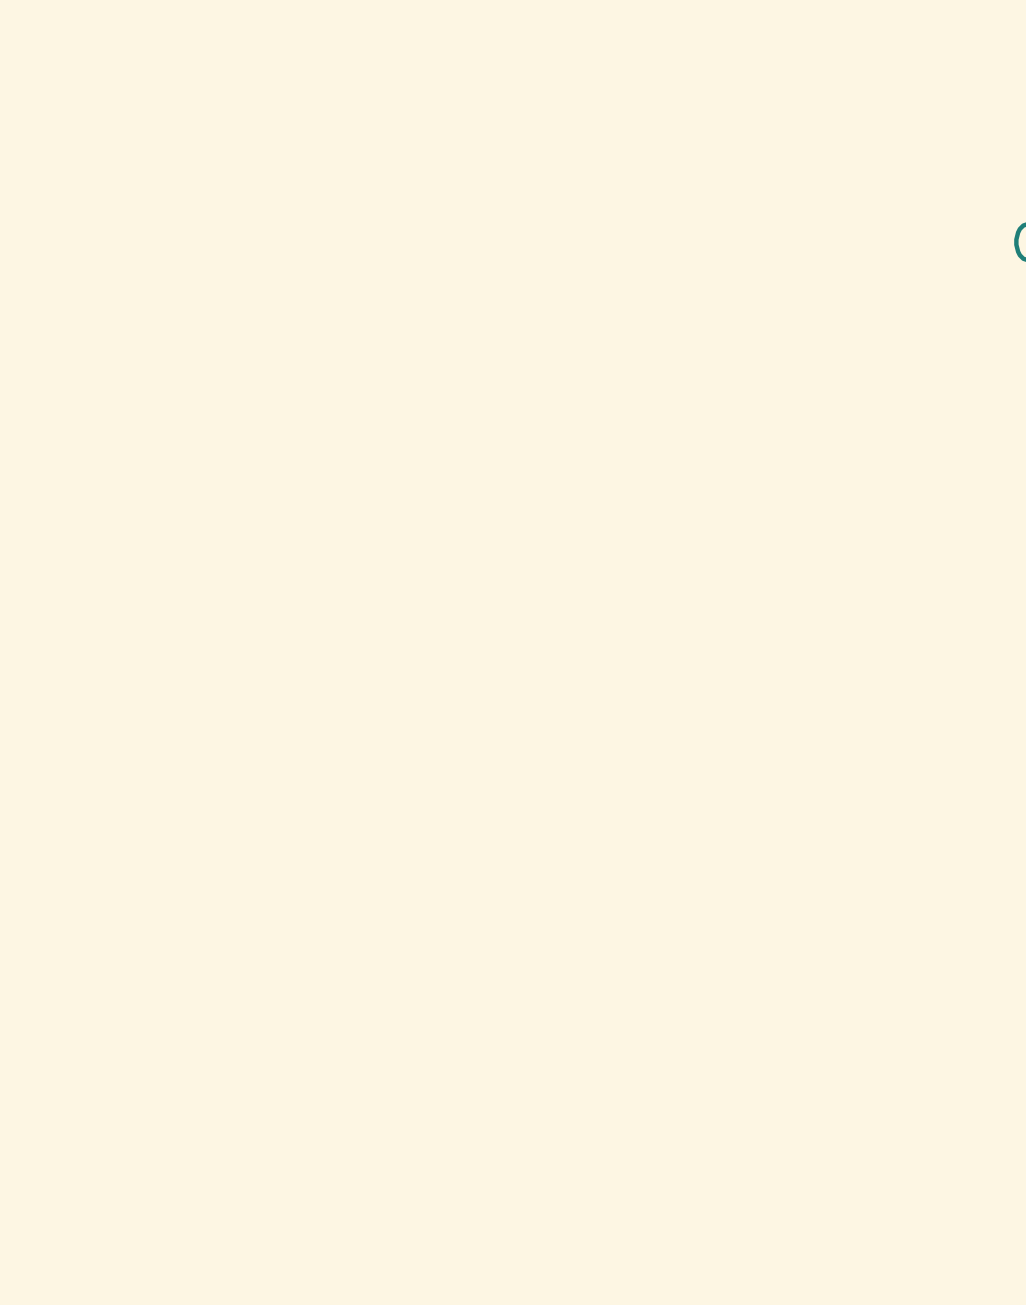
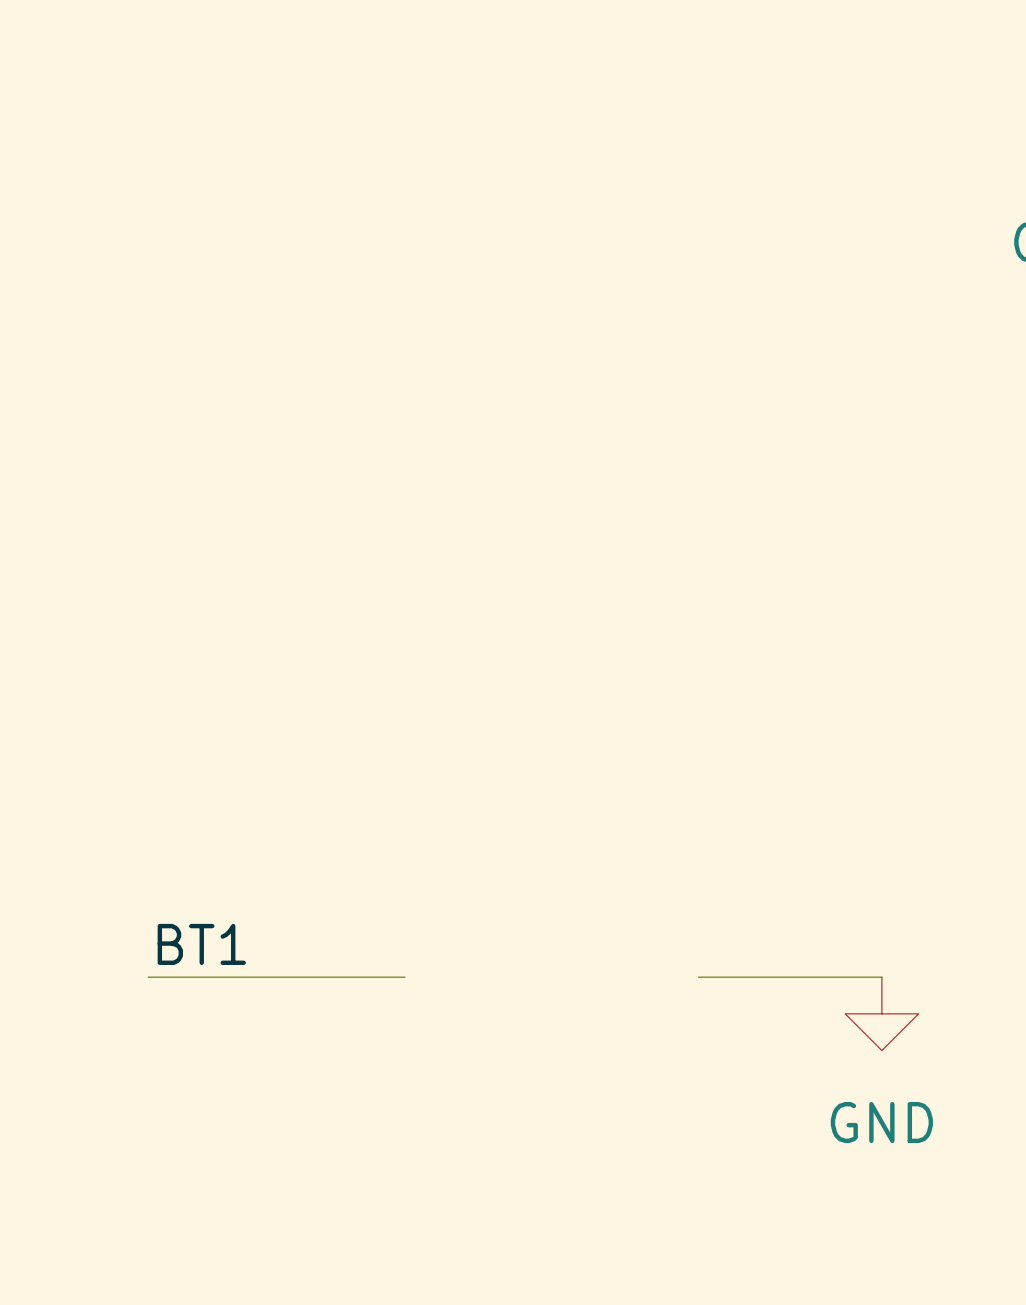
label: none -> BT1 (201, 944)
wire: none -> (148, 977) (404, 977)
wire: none -> (698, 977) (881, 977)
power symbol: none -> GND (881, 1013)

